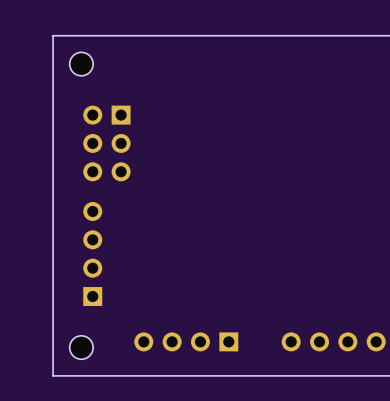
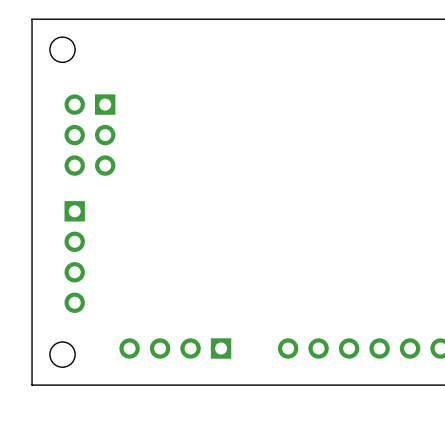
part rotation: 0° (92, 254) -> 180° (74, 257)

